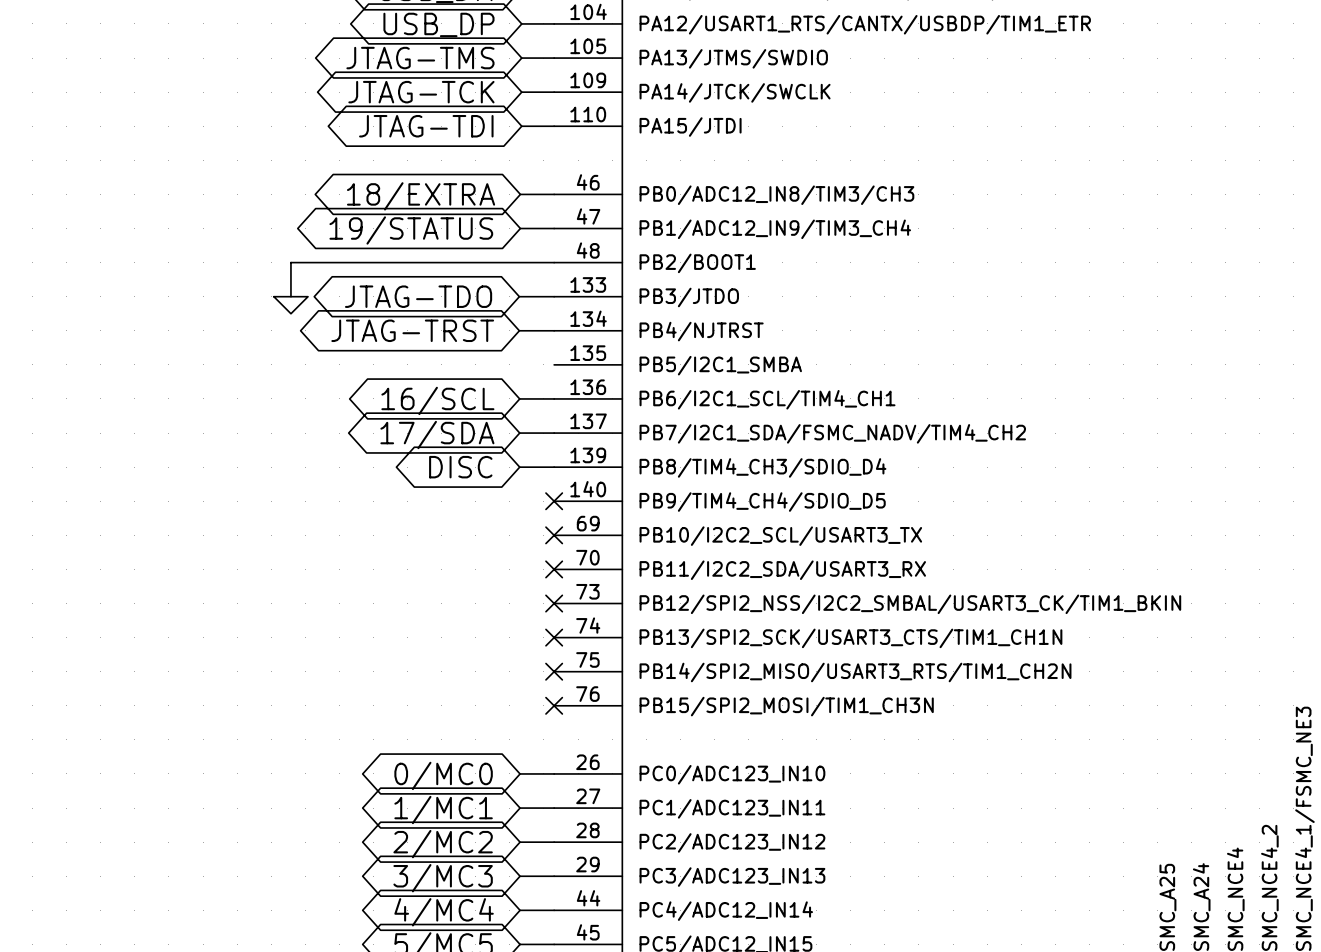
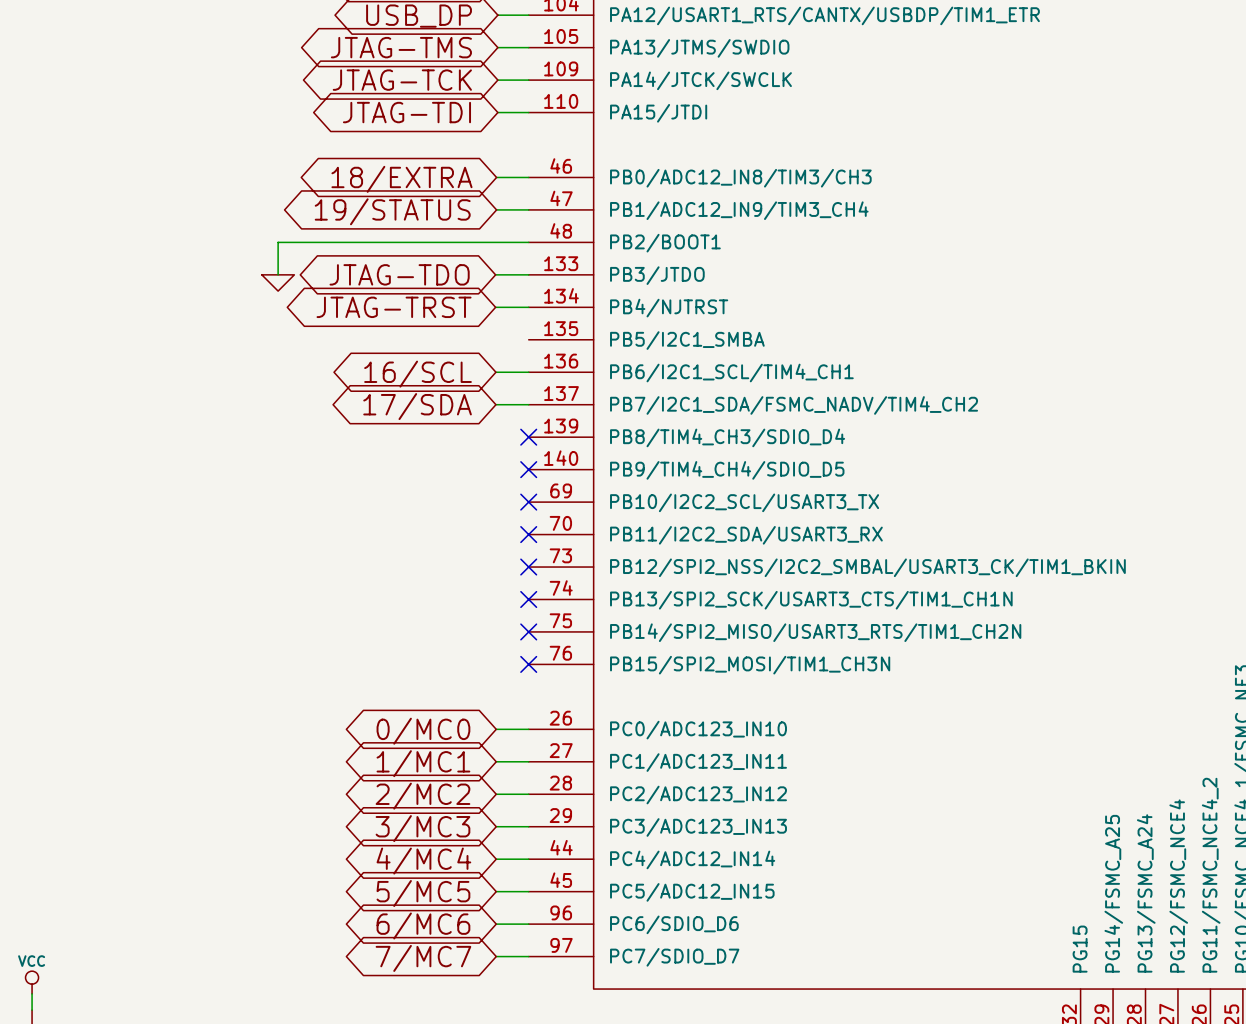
global label: DISC (460, 467) -> none
wire: (519, 467) (554, 467) -> none
no-connect mark: none -> (528, 437)

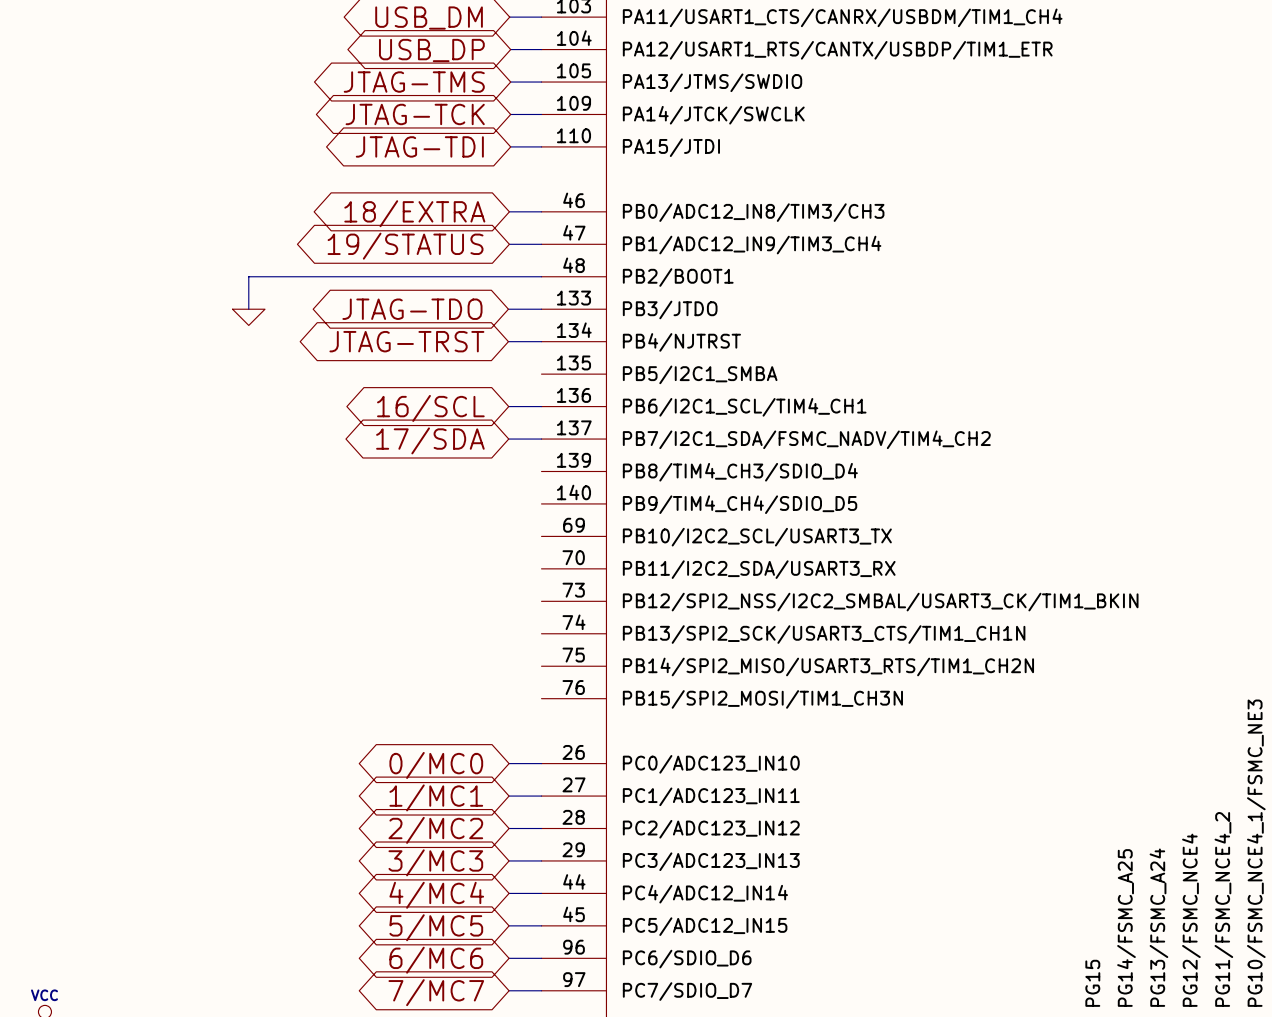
wire: (278, 242) (278, 274) -> (290, 276) (248, 276) (248, 309)
power symbol position: (278, 282) -> (248, 317)
no-connect mark: (528, 437) -> none
no-connect mark: (528, 469) -> none
no-connect mark: (528, 502) -> none
no-connect mark: (528, 534) -> none
no-connect mark: (528, 567) -> none
no-connect mark: (528, 599) -> none
no-connect mark: (528, 631) -> none
no-connect mark: (528, 664) -> none

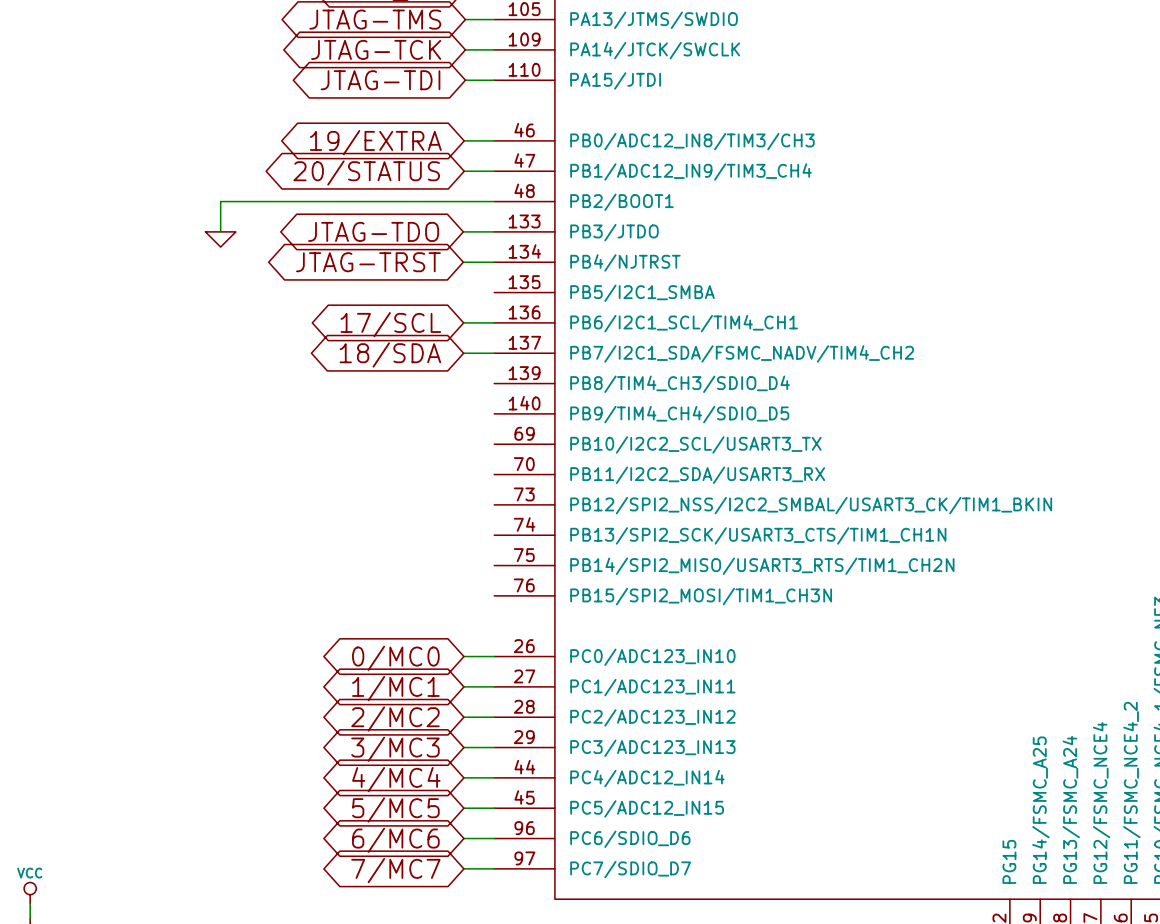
global label: 18/EXTRA (414, 213) -> 19/EXTRA (375, 142)
global label: 19/STATUS (405, 246) -> 20/STATUS (366, 172)
global label: 16/SCL (430, 408) -> 17/SCL (390, 324)
global label: 17/SDA (430, 440) -> 18/SDA (390, 354)

